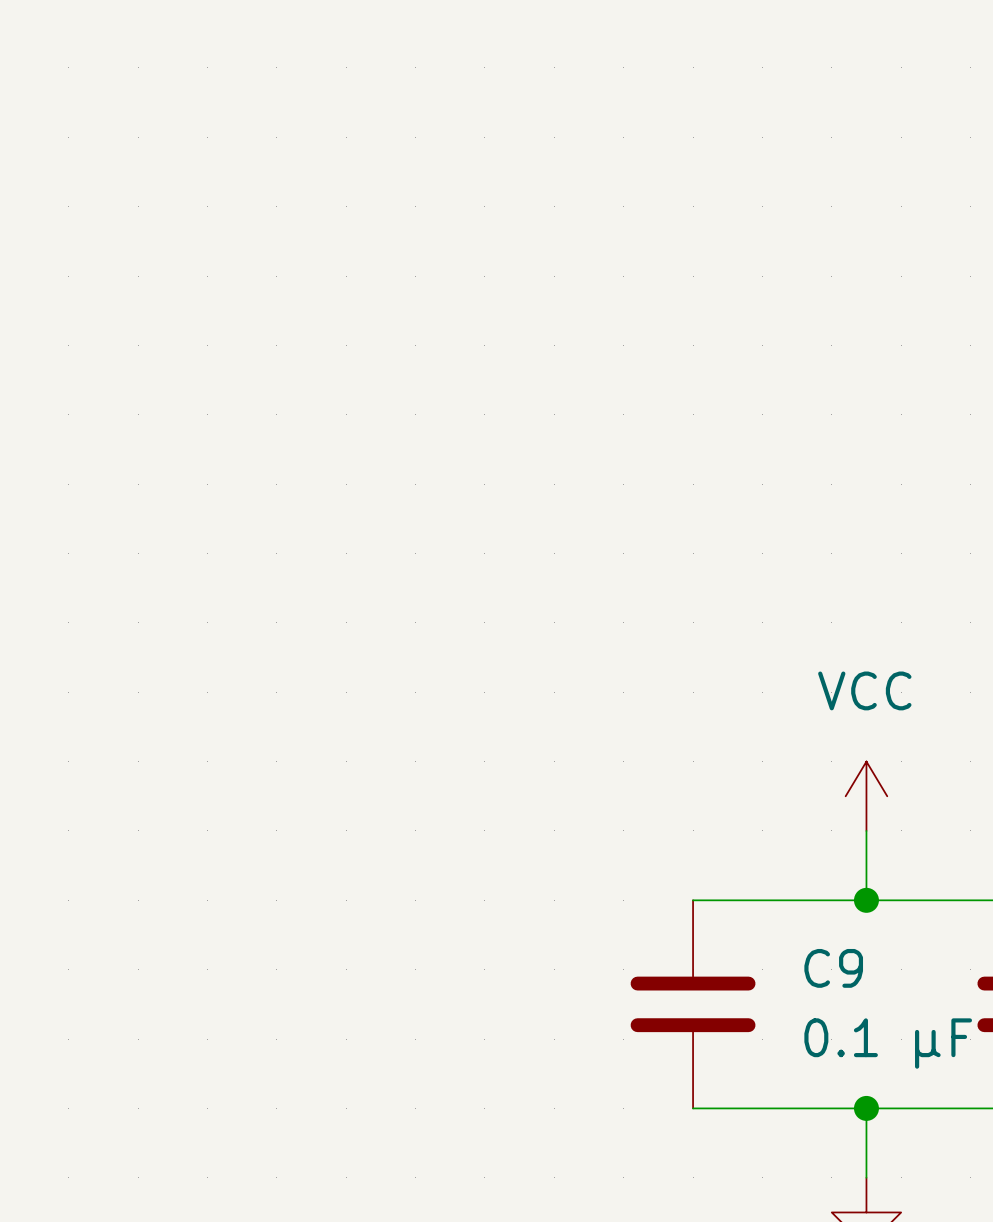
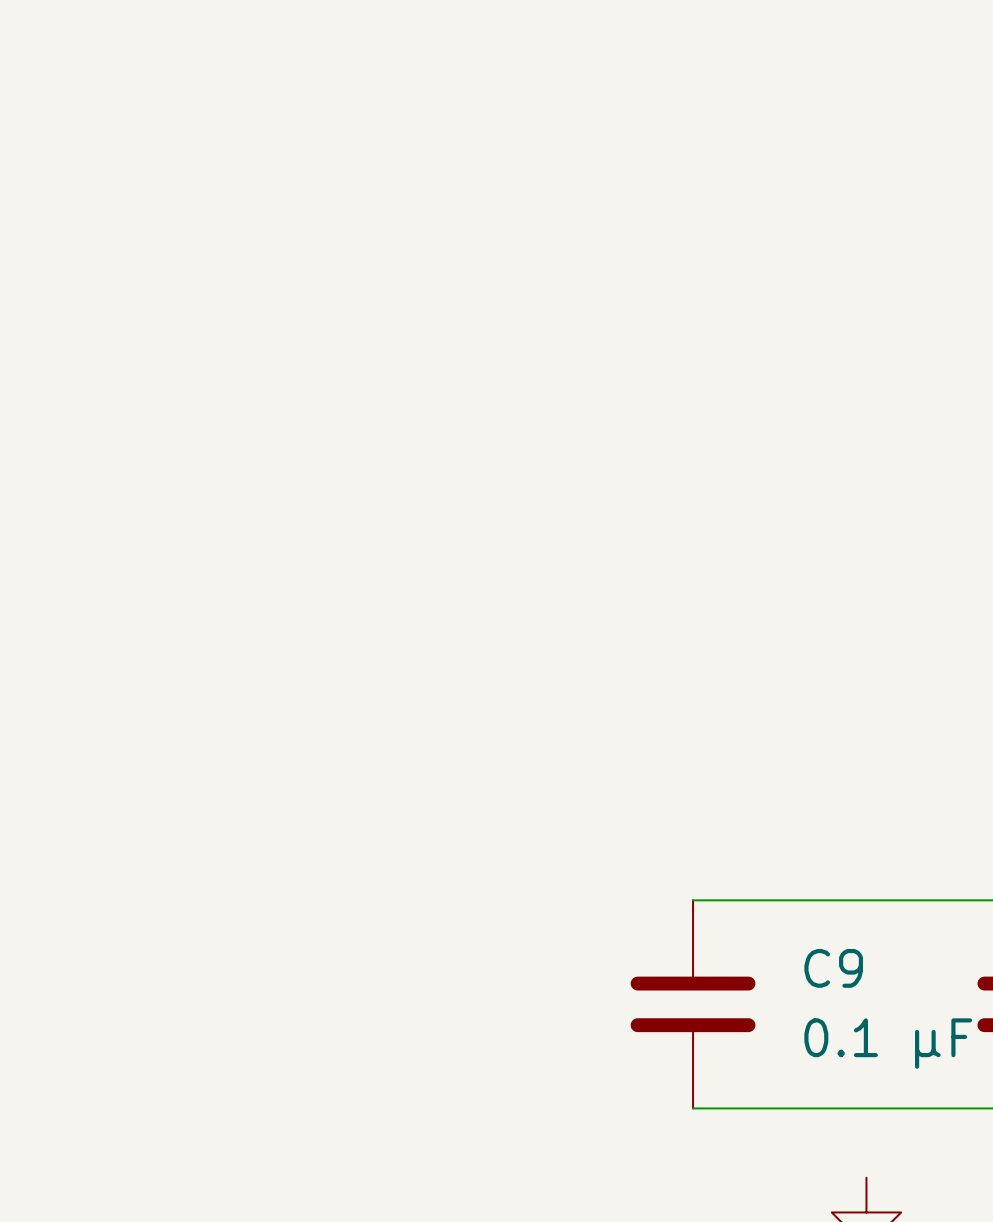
power symbol: VCC (866, 796) -> none
wire: (866, 830) (866, 900) -> none
junction: (866, 900) -> none
wire: (866, 1108) (866, 1177) -> none
junction: (866, 1108) -> none

